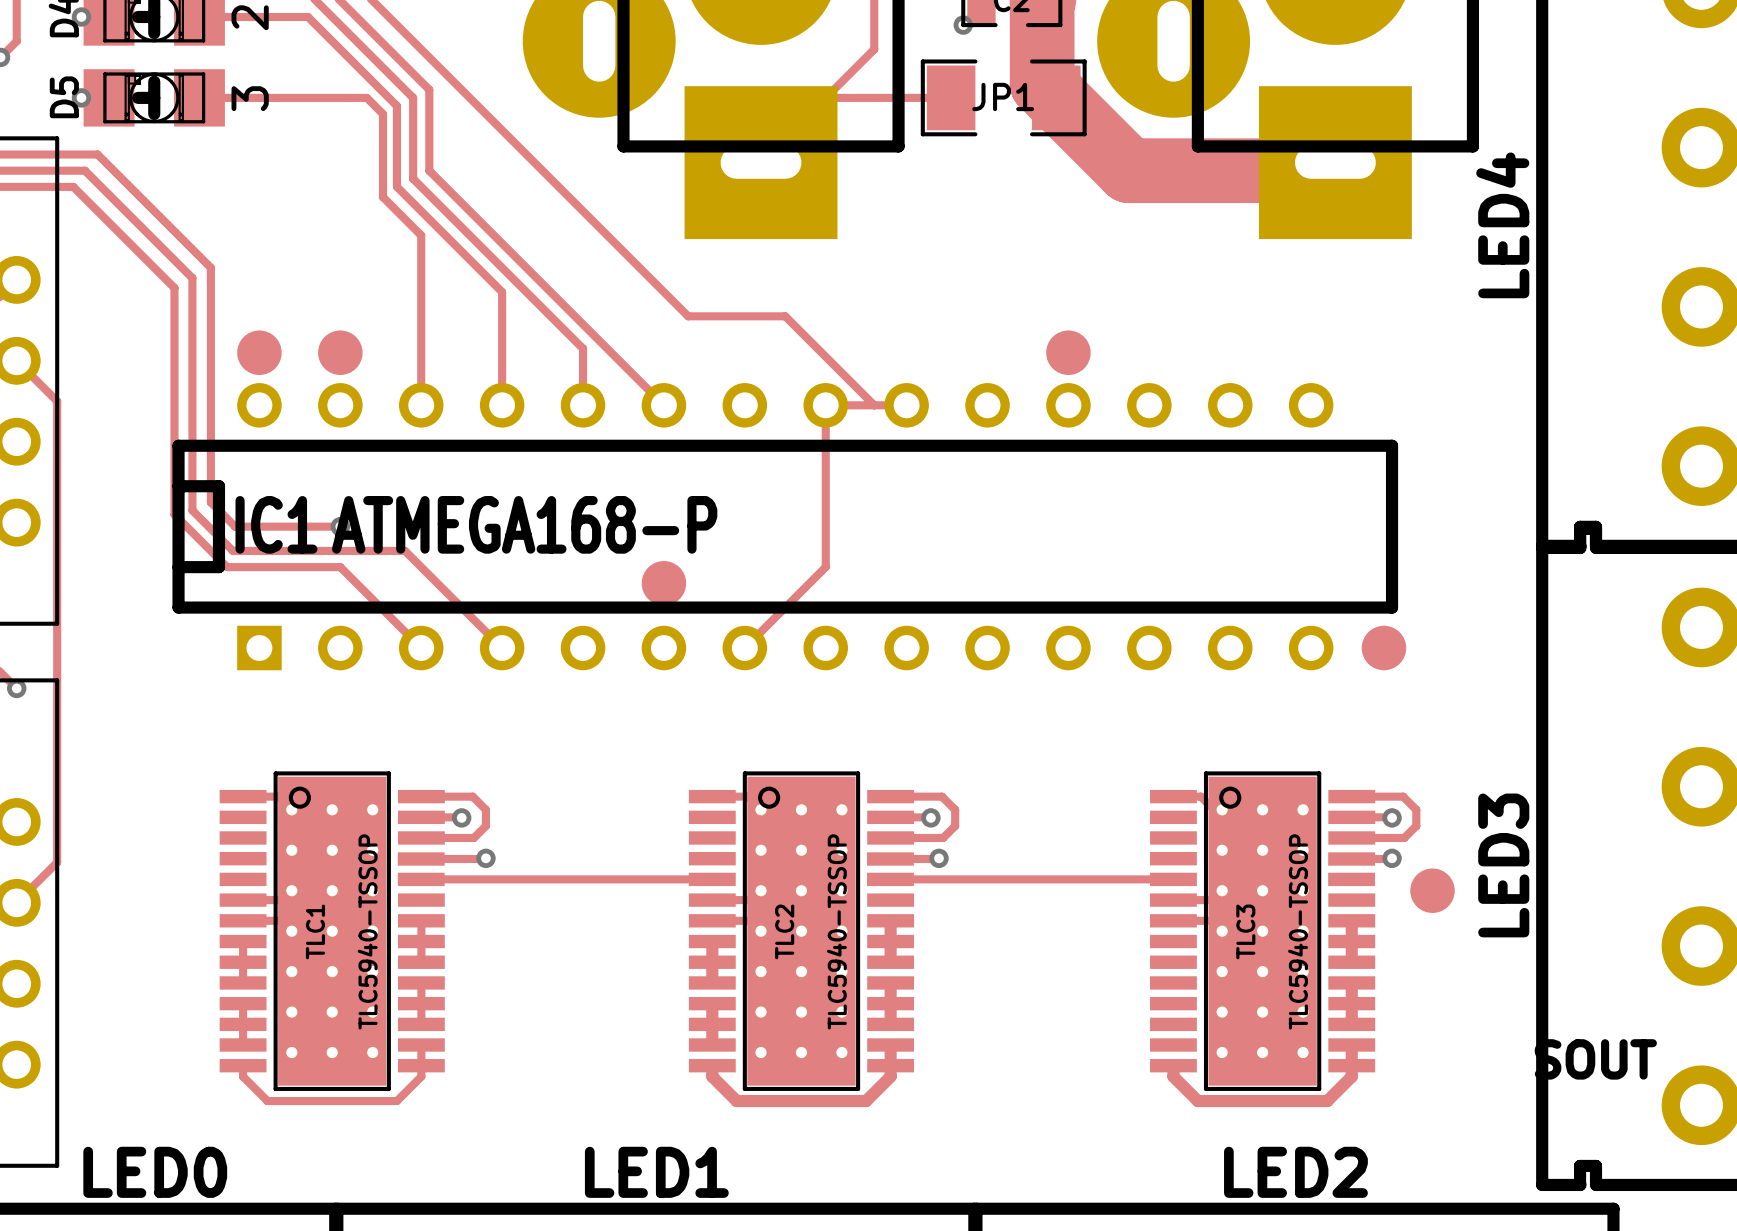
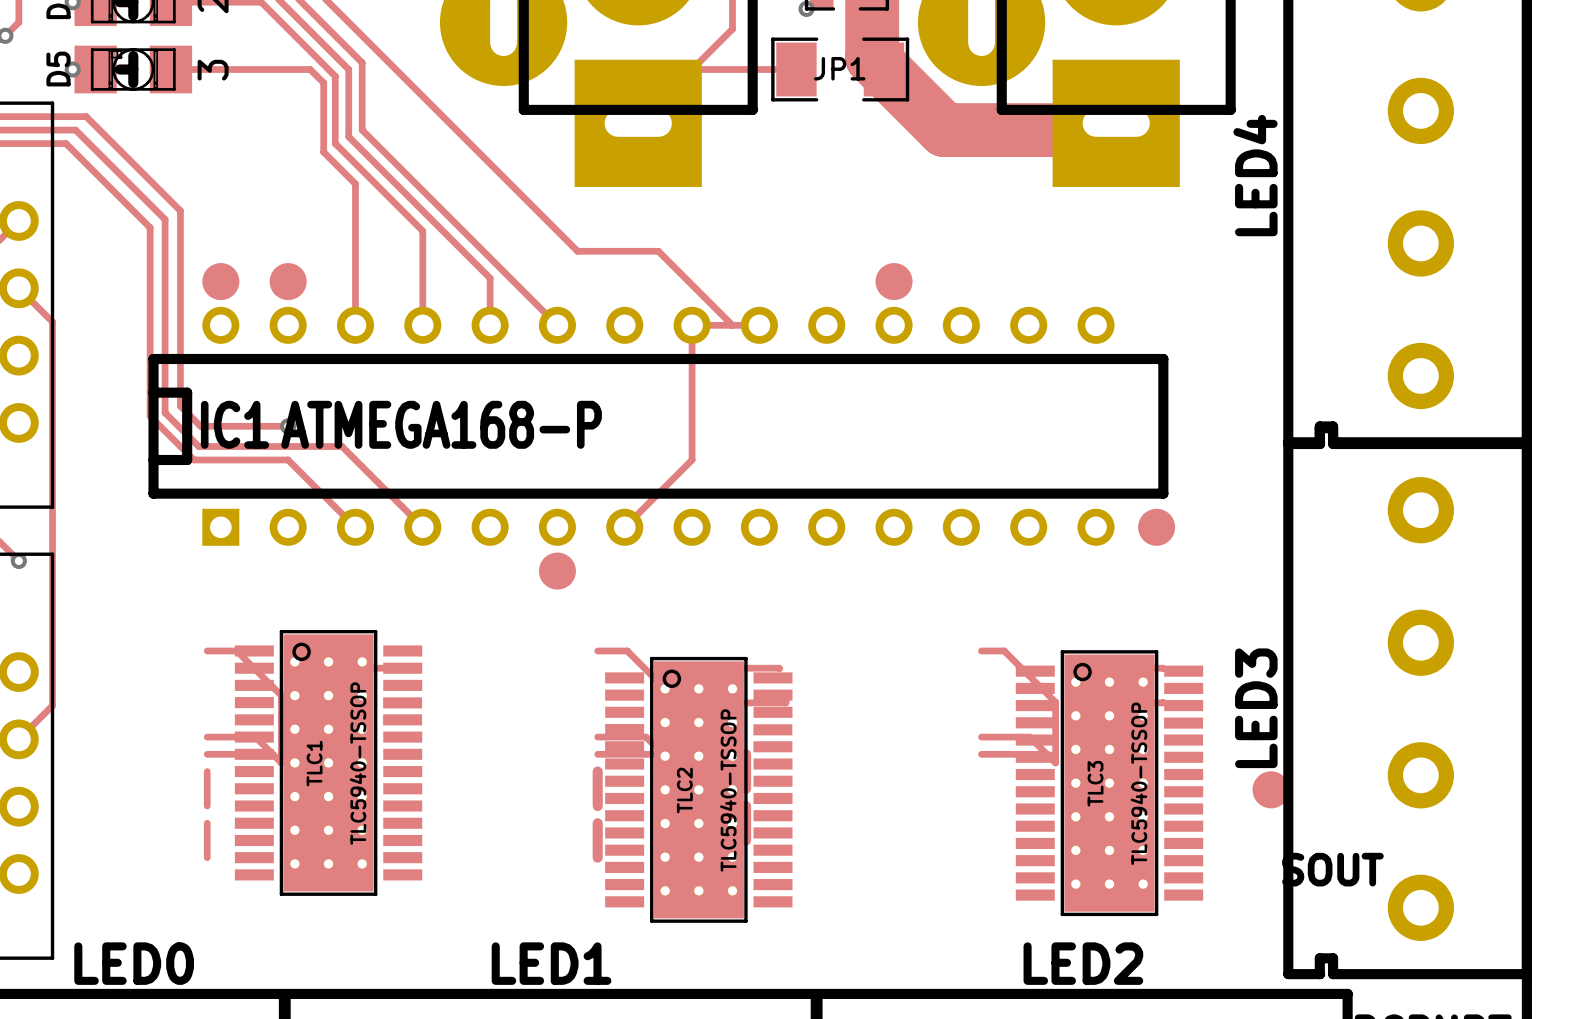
part position: (663, 583) -> (557, 571)
track: (421, 796) (472, 796) (485, 809) (485, 826) (473, 837) (421, 837) -> none
track: (890, 796) (941, 796) (955, 809) (955, 826) (943, 837) (890, 837) -> none
track: (1351, 796) (1403, 796) (1416, 809) (1416, 826) (1404, 837) (1351, 837) -> none
via: (461, 817) -> none
via: (930, 817) -> none
via: (1392, 817) -> none
track: (485, 858) (421, 859) -> none
via: (485, 858) -> none
via: (939, 858) -> none
via: (1392, 858) -> none
track: (421, 879) (712, 879) -> none
track: (890, 879) (1173, 879) -> none
part position: (1432, 890) -> (1271, 789)
TLC1 position: (332, 931) -> (328, 762)
TLC2 position: (801, 931) -> (698, 789)
TLC3 position: (1262, 931) -> (1109, 783)
track: (421, 1044) (421, 1076) (396, 1101) (267, 1101) (243, 1076) (243, 1065) -> none
track: (890, 1044) (890, 1076) (866, 1101) (736, 1101) (712, 1076) (712, 1065) -> none
track: (1351, 1044) (1351, 1076) (1327, 1101) (1197, 1101) (1173, 1076) (1173, 1065) -> none

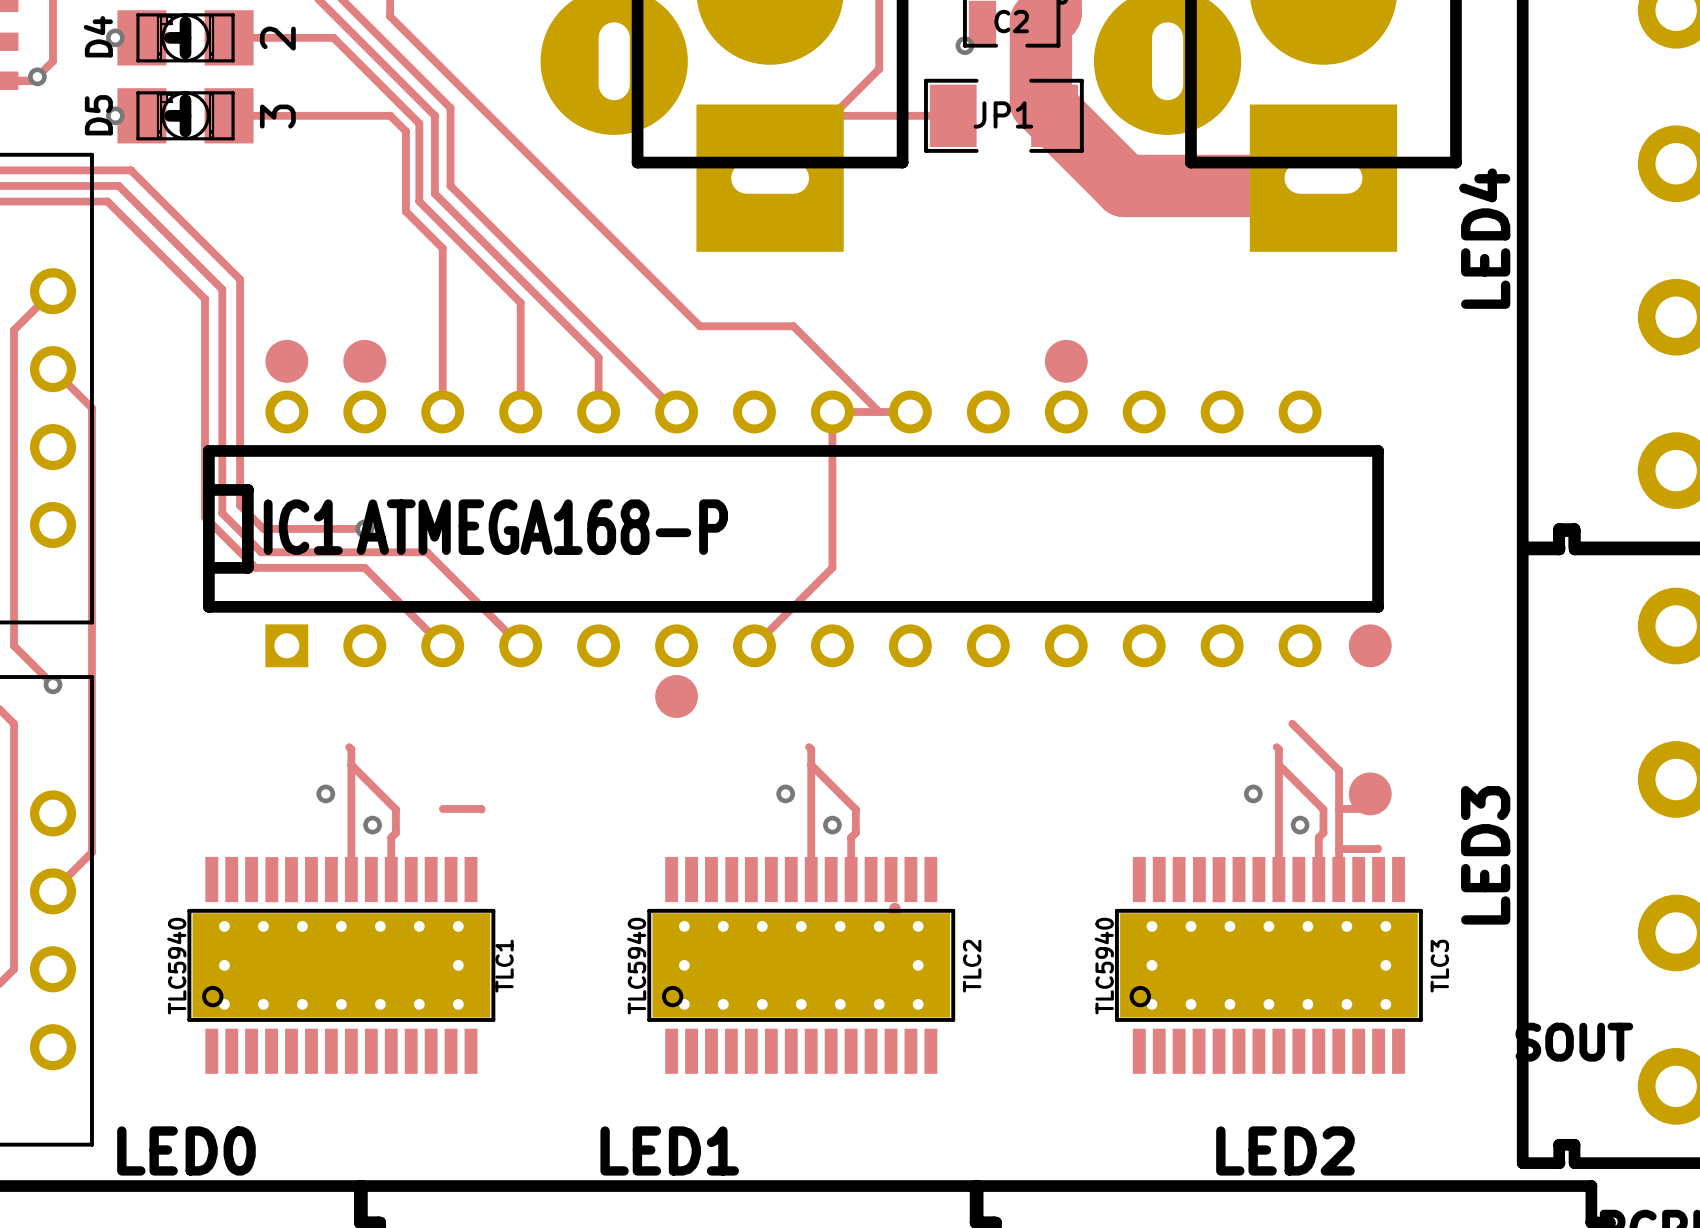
track: none -> (1292, 723) (1339, 770) (1339, 879)
track: none -> (349, 747) (351, 749) (351, 879)
track: none -> (809, 747) (811, 749) (811, 879)
track: none -> (1276, 747) (1278, 749) (1278, 879)
TLC1 footprint: [234, 629, 423, 896] -> [187, 856, 496, 1074]
track: none -> (351, 764) (395, 809) (395, 832) (391, 837) (391, 879)
track: none -> (811, 764) (855, 809) (855, 832) (851, 837) (851, 879)
track: none -> (1278, 764) (1323, 809) (1323, 832) (1318, 837) (1318, 879)
track: (207, 650) (236, 650) (281, 695) (281, 762) (255, 737) (207, 737) -> none
track: (597, 650) (627, 650) (671, 695) (671, 762) (646, 737) (597, 737) -> none
track: (981, 650) (1004, 650) (1055, 702) (1055, 762) (1029, 737) (981, 737) -> none
TLC3 footprint: [1015, 650, 1204, 917] -> [1114, 856, 1423, 1074]
via: none -> (325, 793)
via: none -> (785, 793)
via: none -> (1253, 793)
TLC2 footprint: [605, 656, 793, 923] -> [647, 856, 956, 1074]
track: (746, 668) (779, 668) -> none
via: none -> (372, 825)
via: none -> (832, 825)
via: none -> (1300, 825)
track: (786, 702) (745, 702) -> none
track: (207, 754) (272, 754) -> none
track: (597, 754) (663, 754) -> none
track: (981, 754) (1047, 754) -> none
TLC1 name position: TLC1 (314, 763) -> TLC1 (504, 966)
TLC1 value: TLC5940-TSSOP (358, 763) -> TLC5940 (176, 966)
track: (207, 771) (207, 806) -> none
track: (597, 771) (597, 806) -> none
TLC3 name position: TLC3 (1095, 783) -> TLC3 (1439, 966)
TLC3 value: TLC5940-TSSOP (1138, 783) -> TLC5940 (1104, 966)
part position: (1271, 789) -> (1370, 793)
TLC2 name position: TLC2 (684, 790) -> TLC2 (972, 966)
TLC2 value: TLC5940-TSSOP (728, 790) -> TLC5940 (636, 966)
track: (207, 823) (207, 857) -> none
track: (597, 823) (597, 857) -> none

